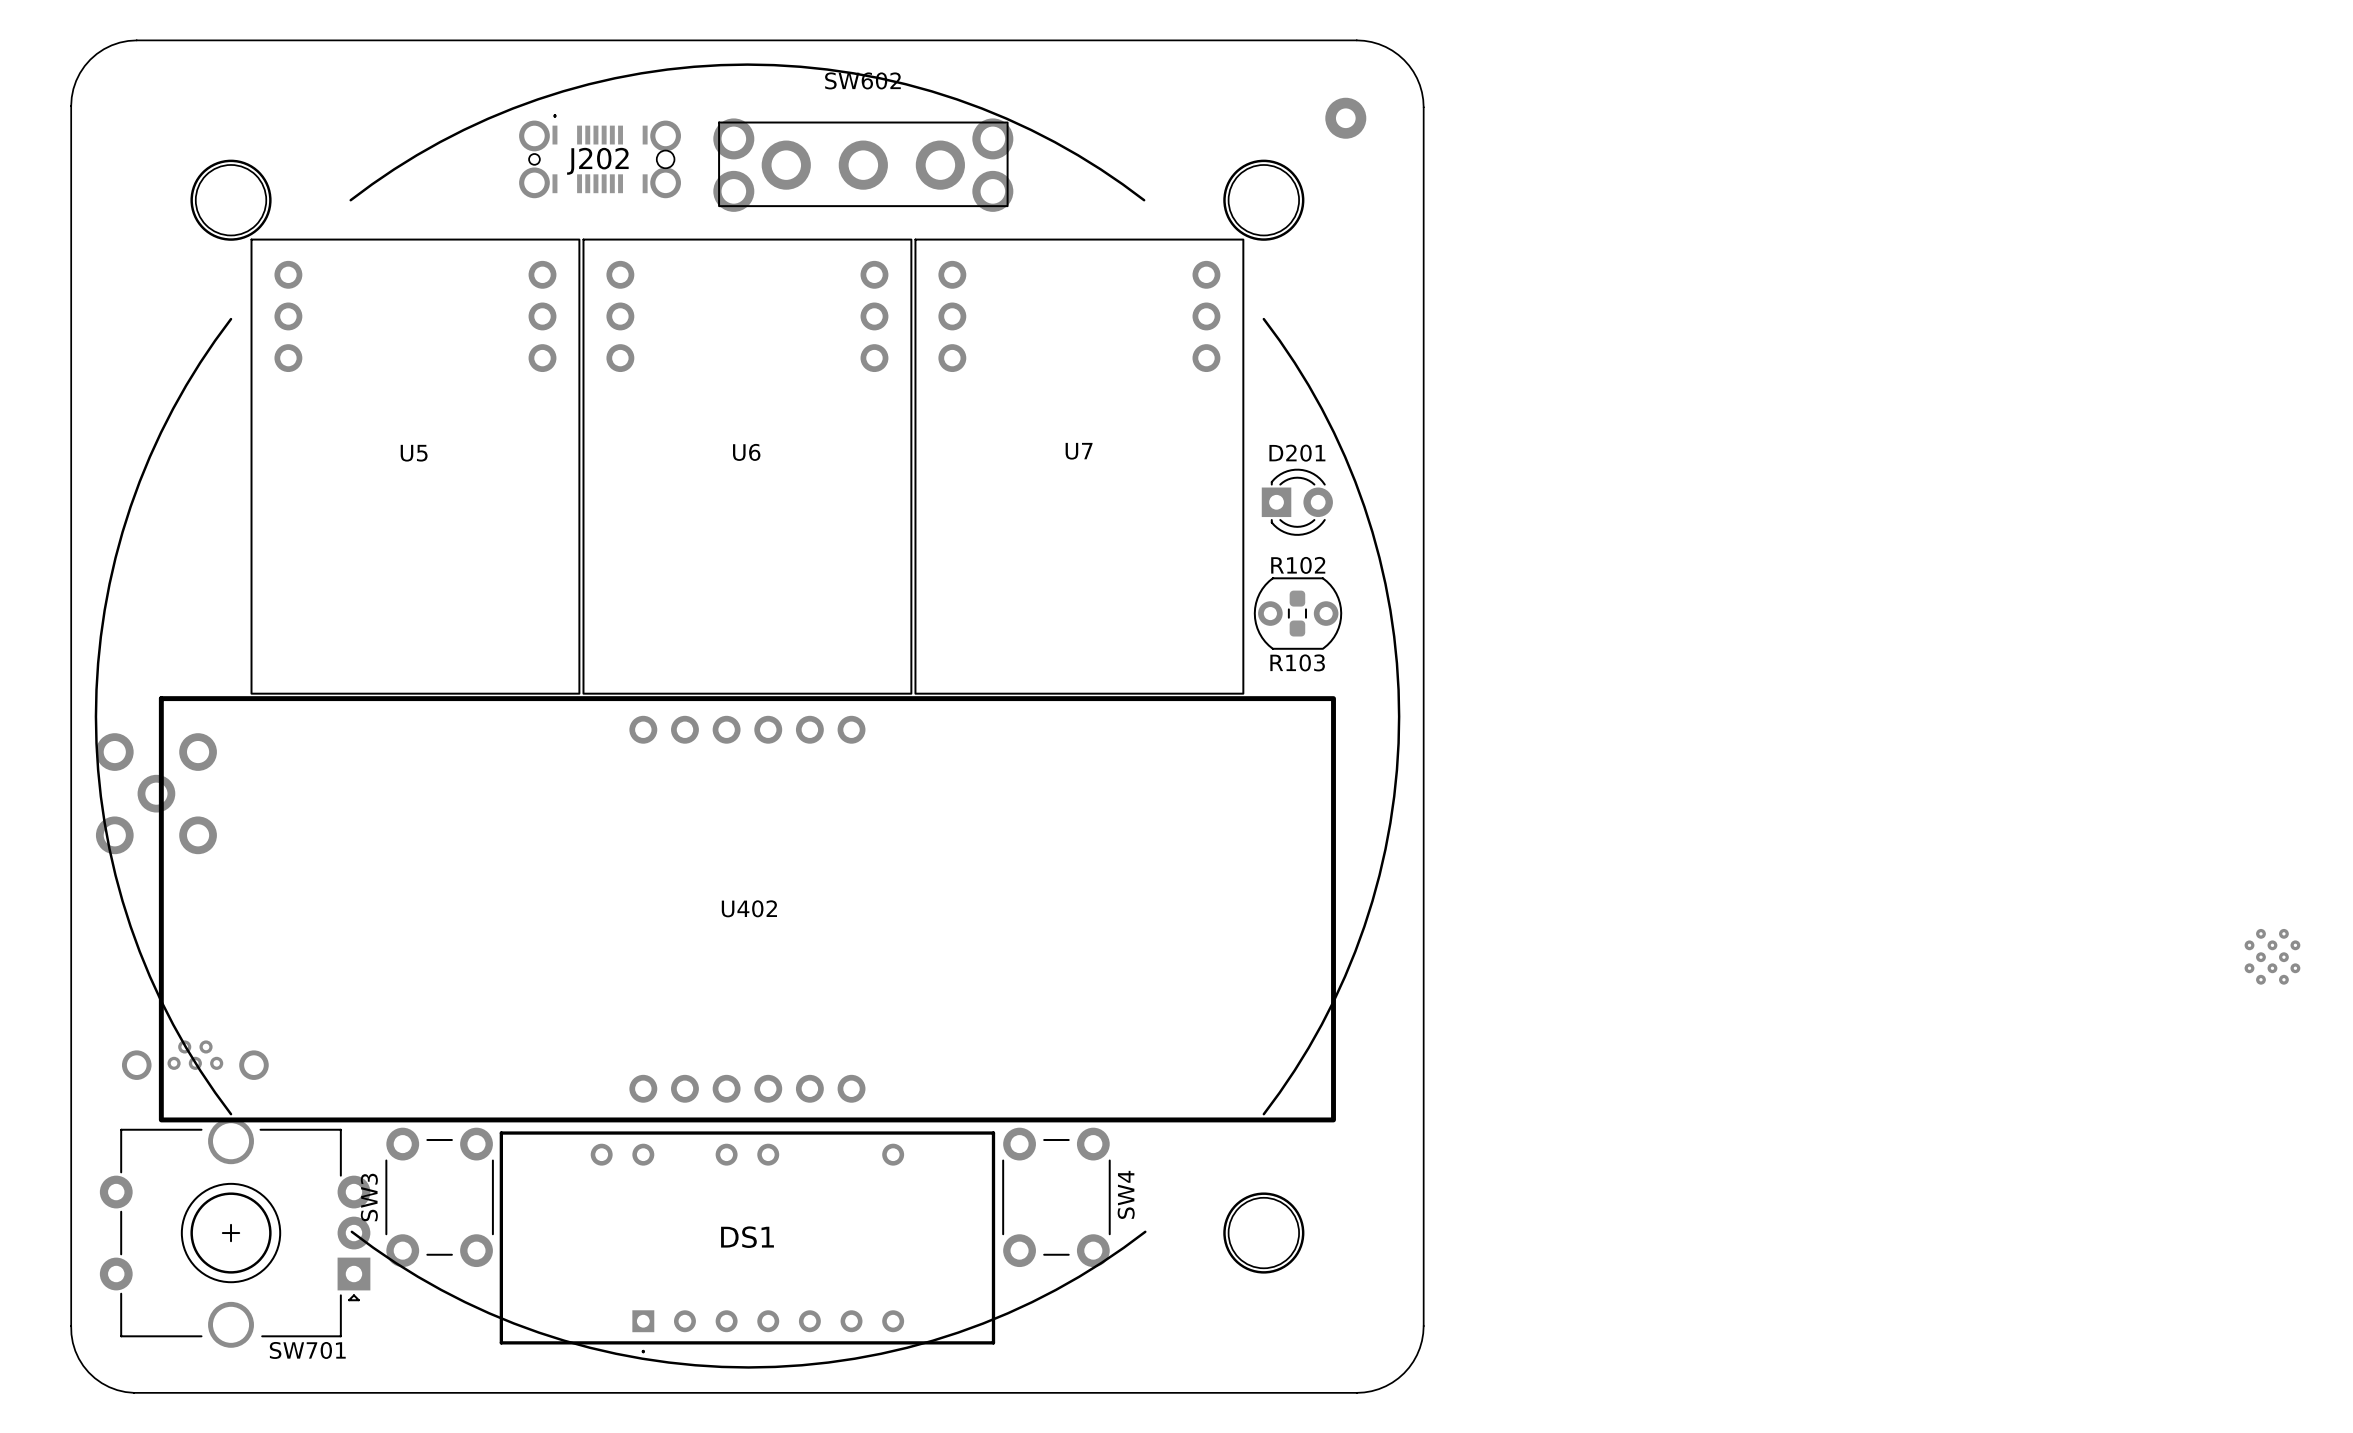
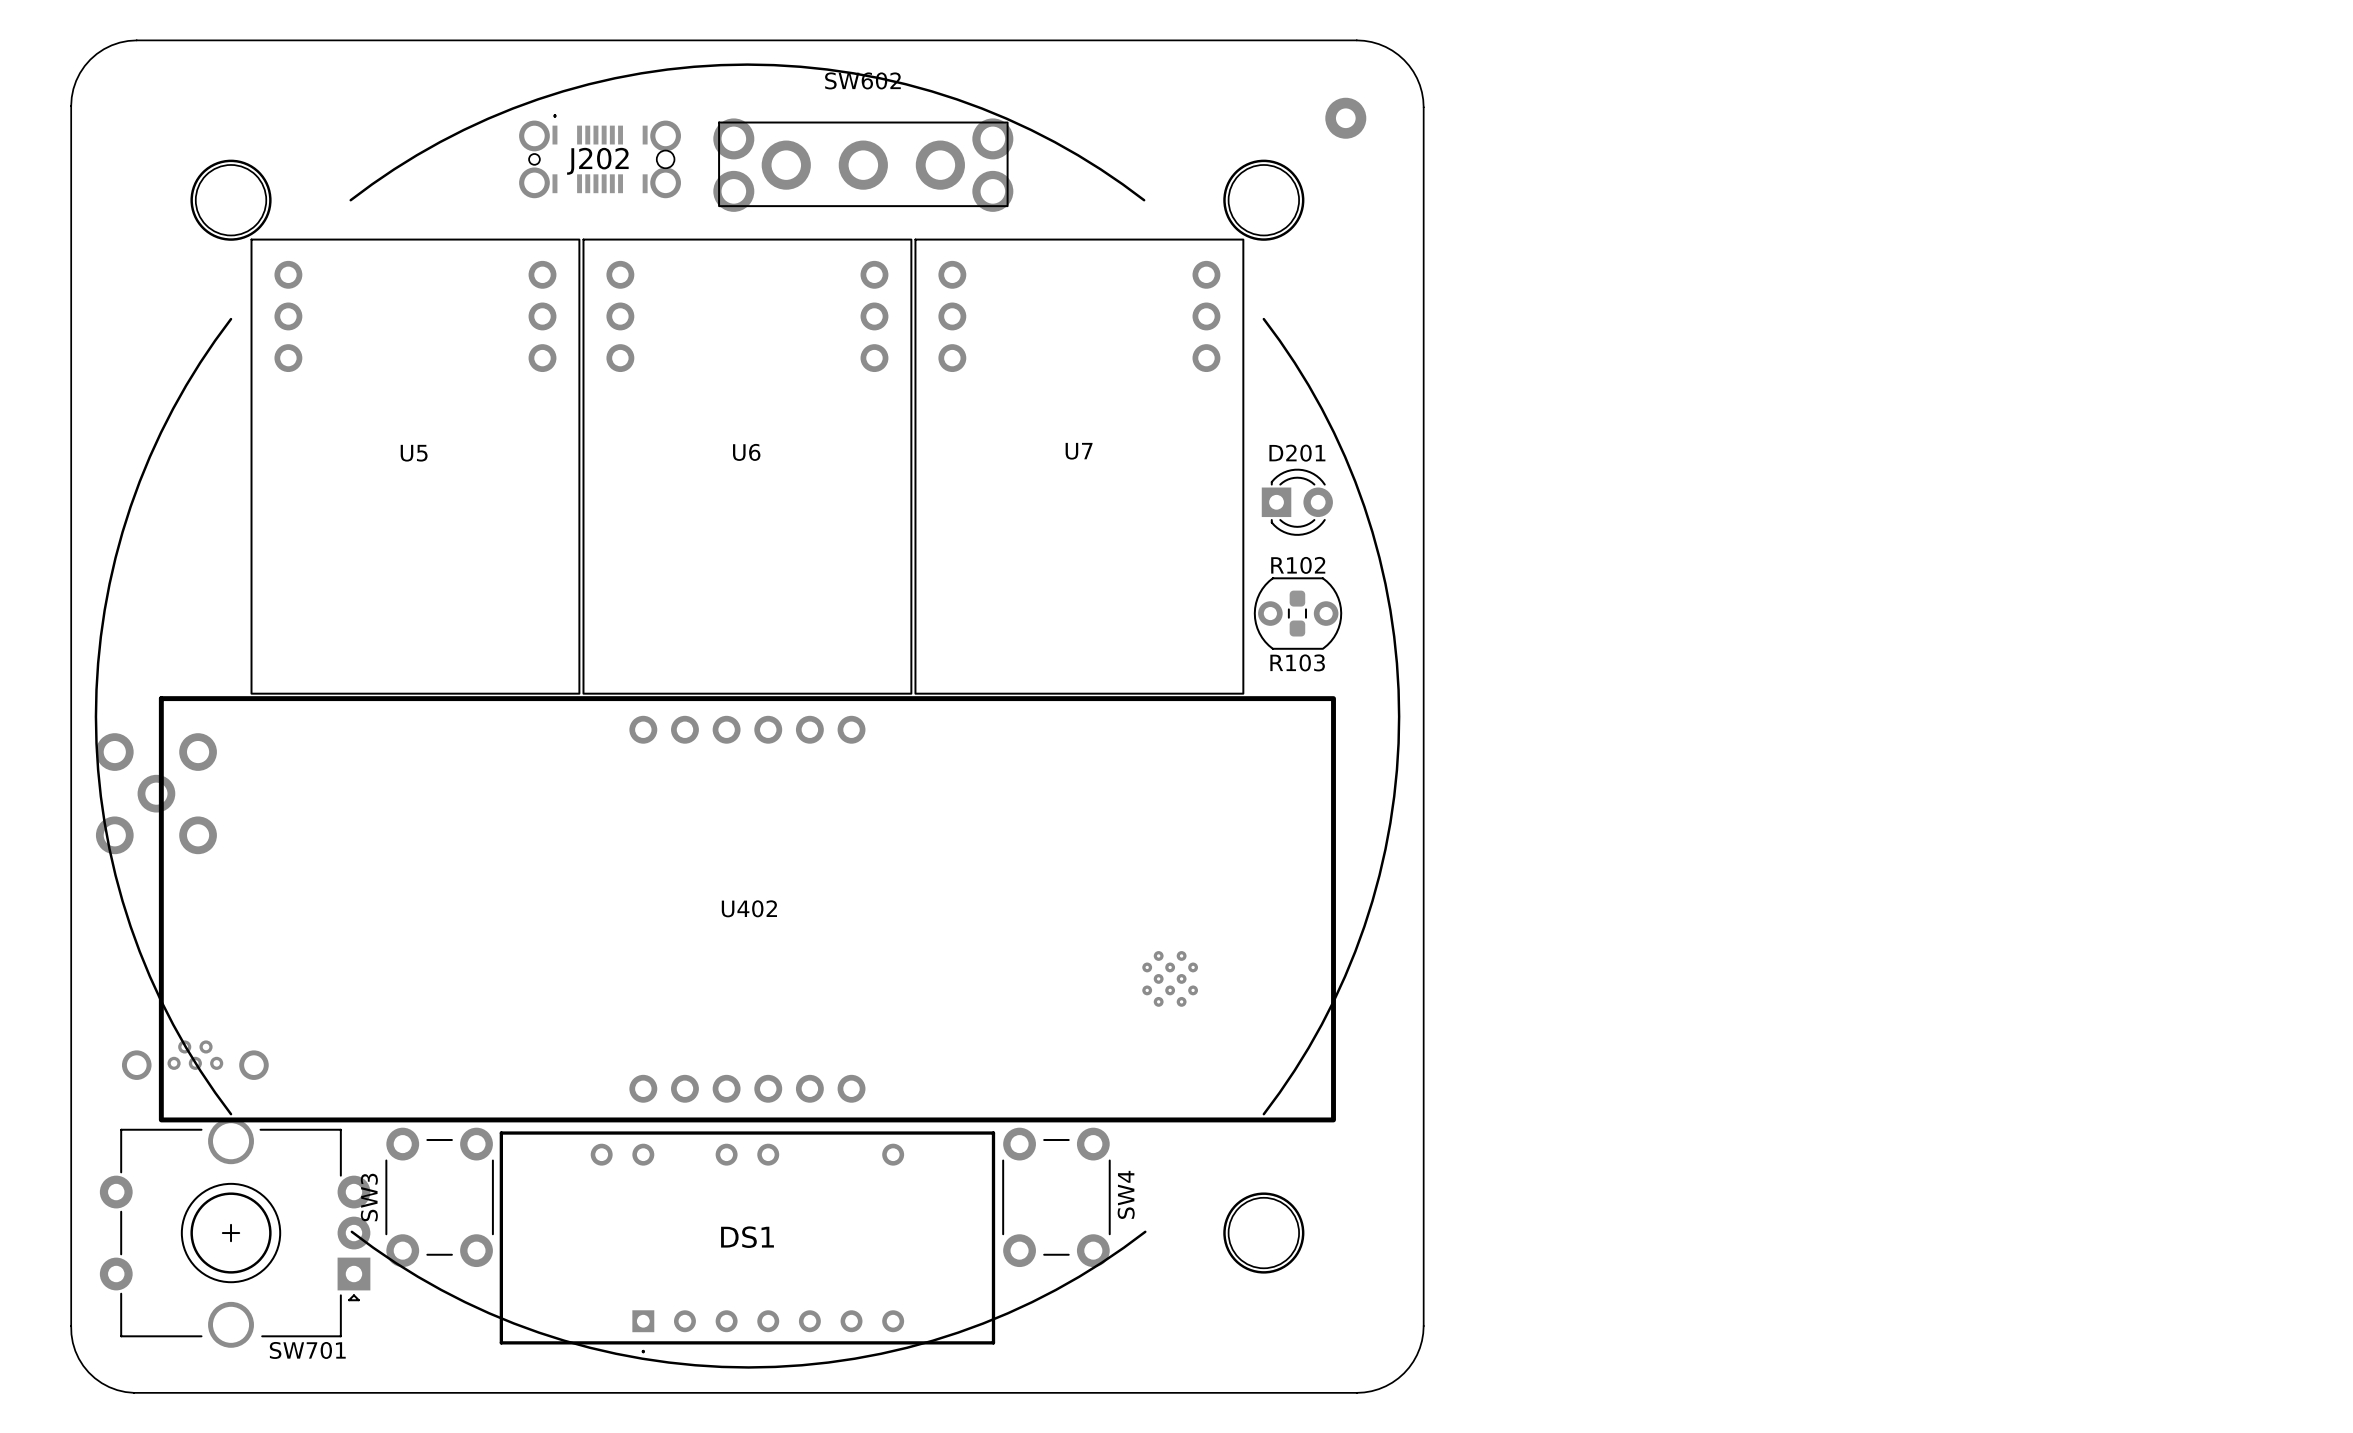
part: (2272, 956) -> none
part: none -> (1170, 978)

